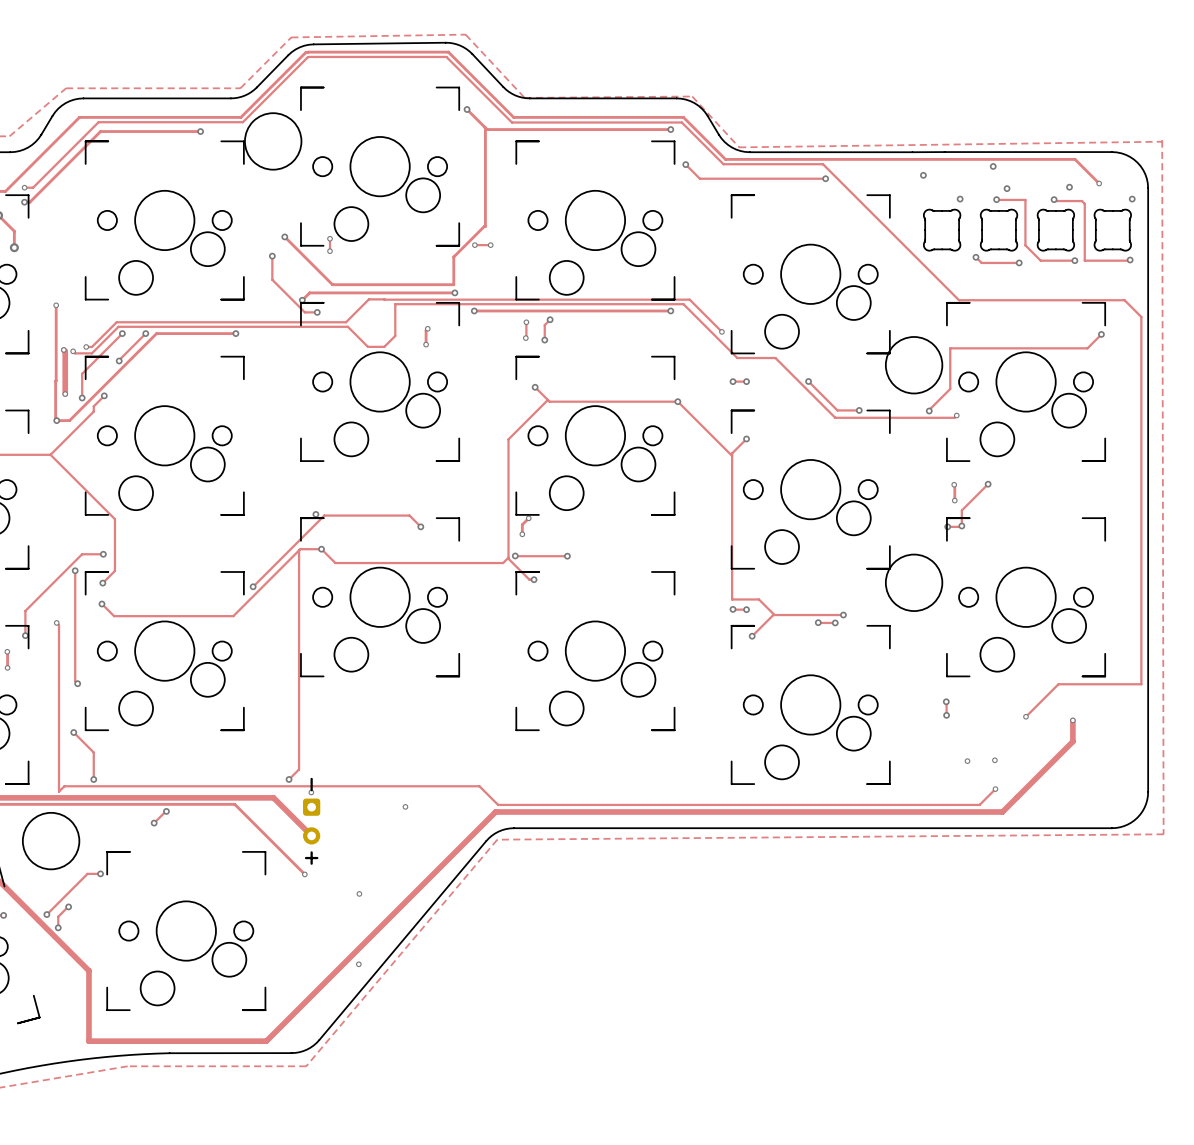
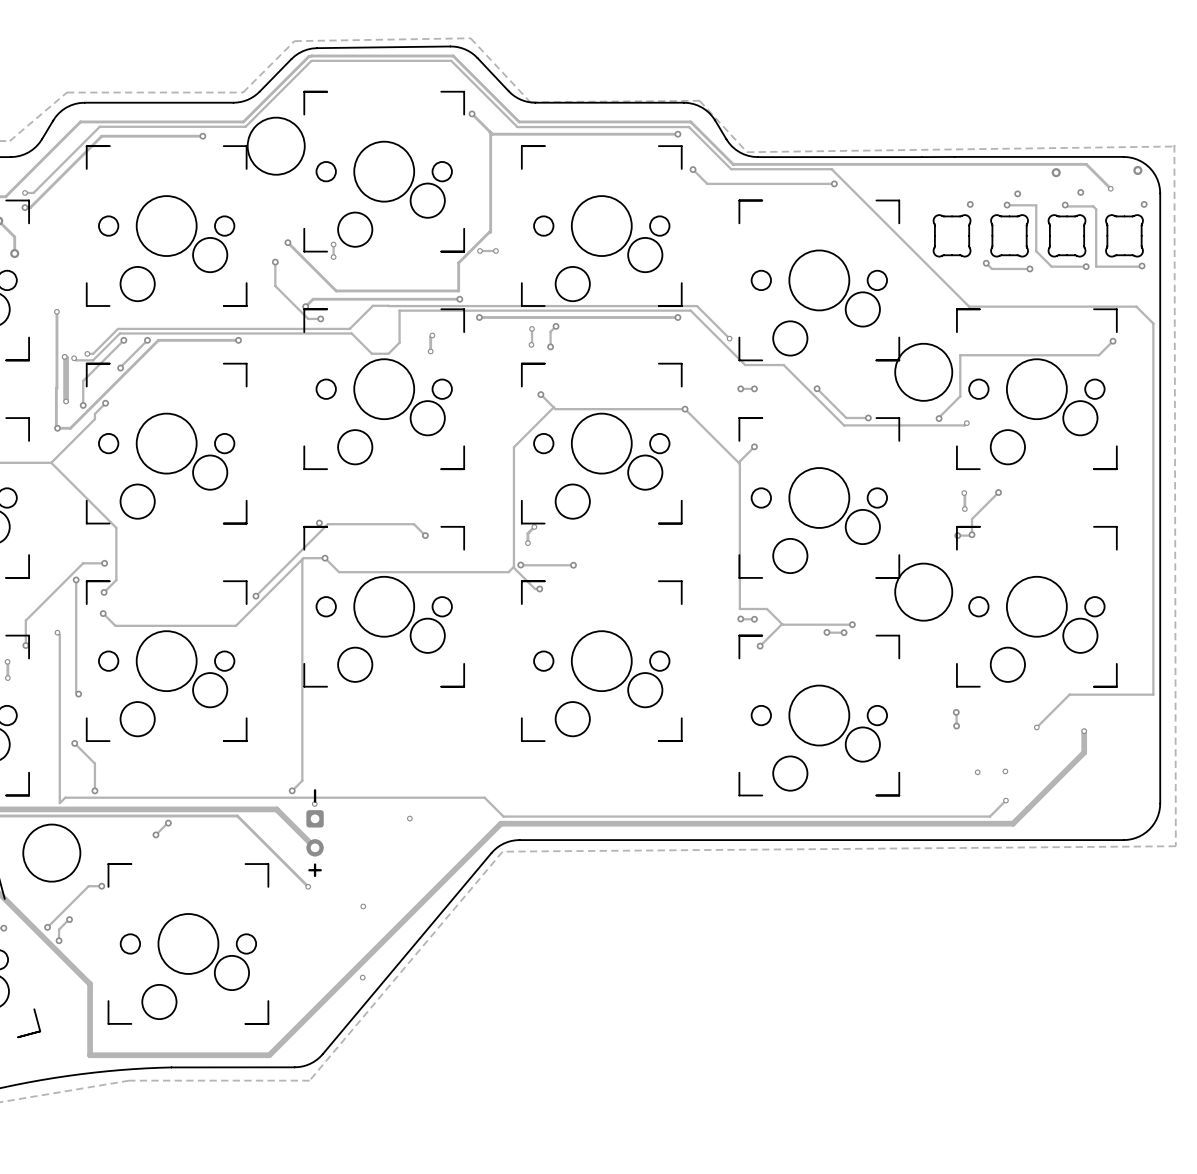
via: none -> (1137, 170)
via: (993, 166) -> none
via: none -> (1056, 172)
via: (923, 175) -> none

